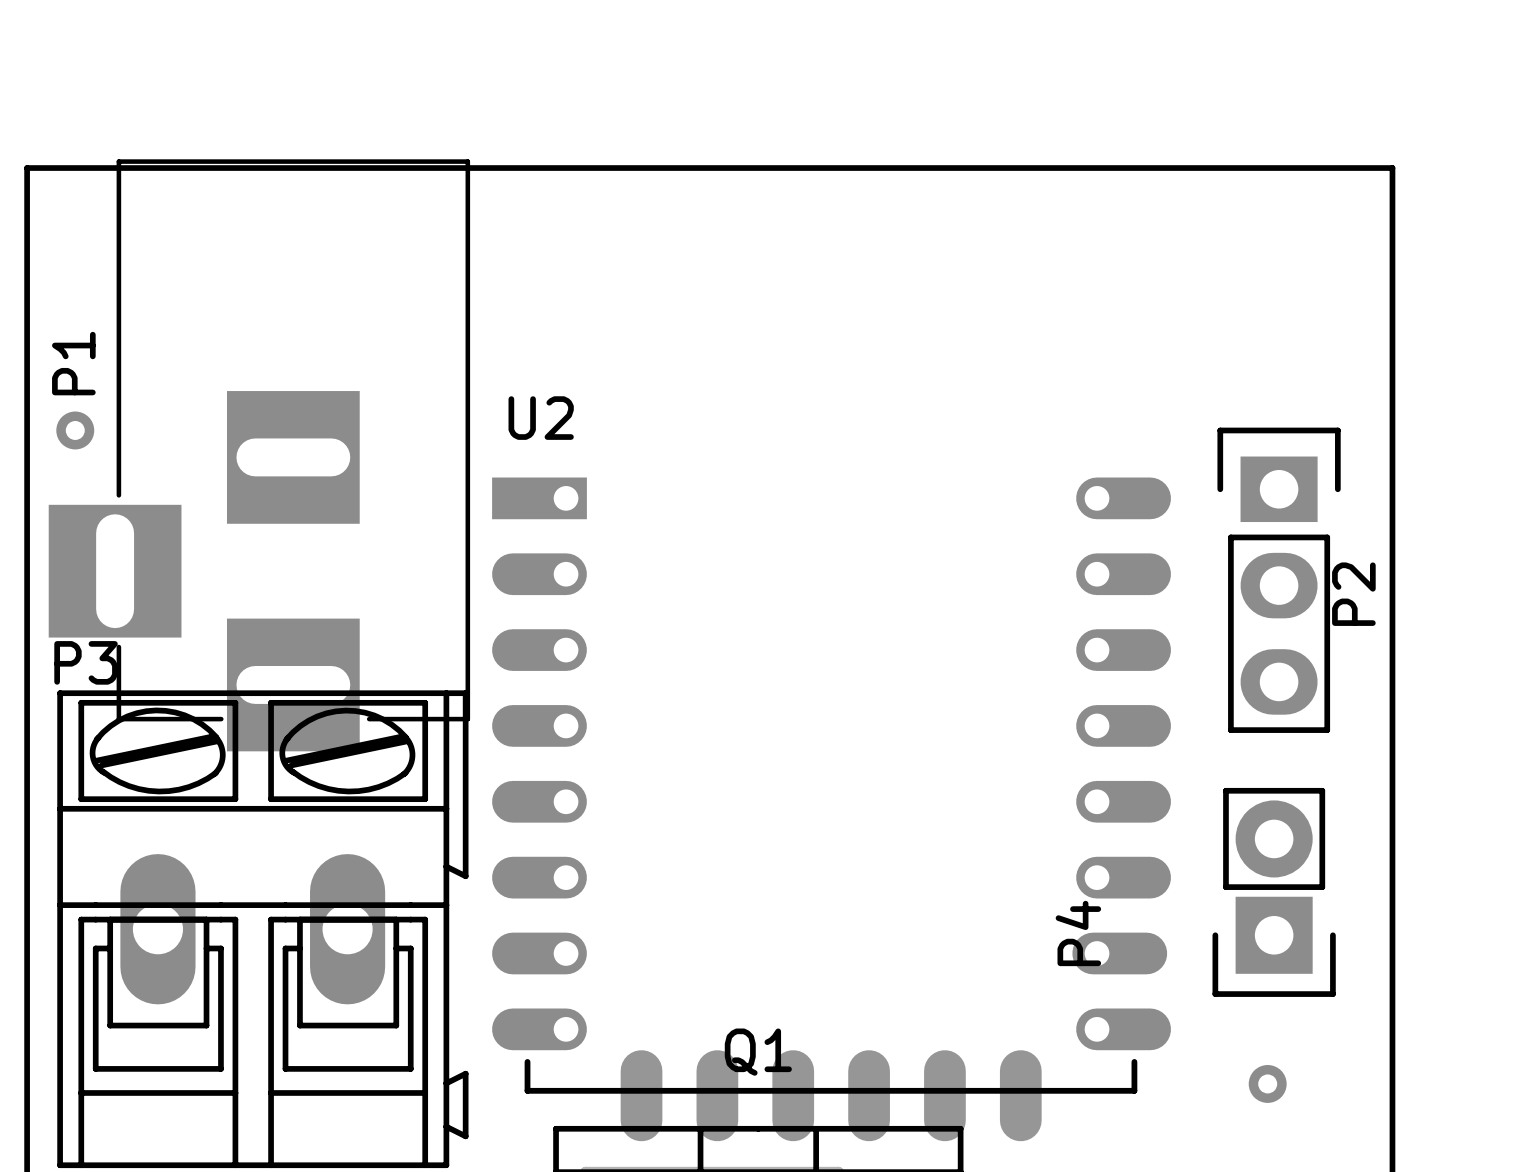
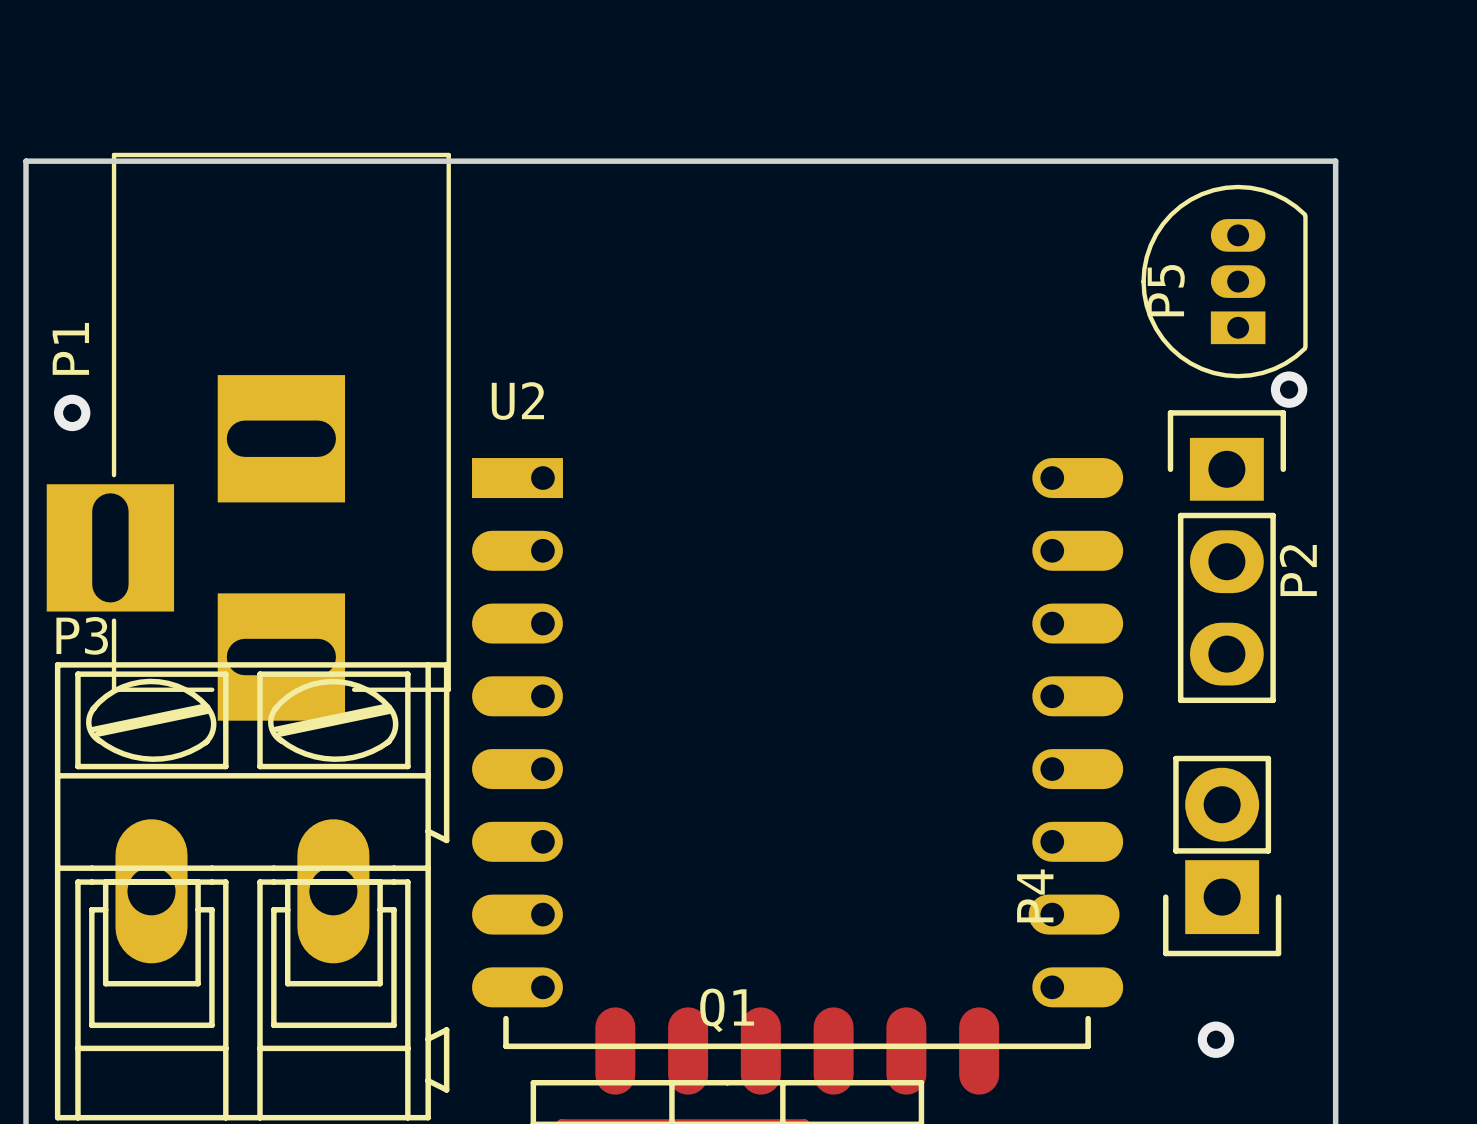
P5: none -> (1224, 281)
via: none -> (1289, 389)

